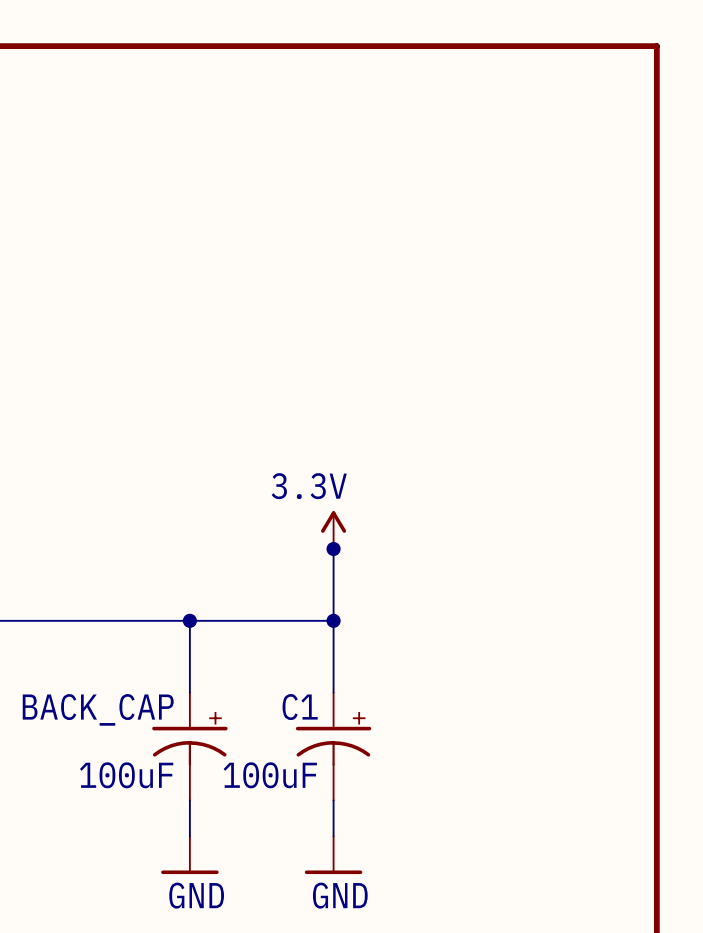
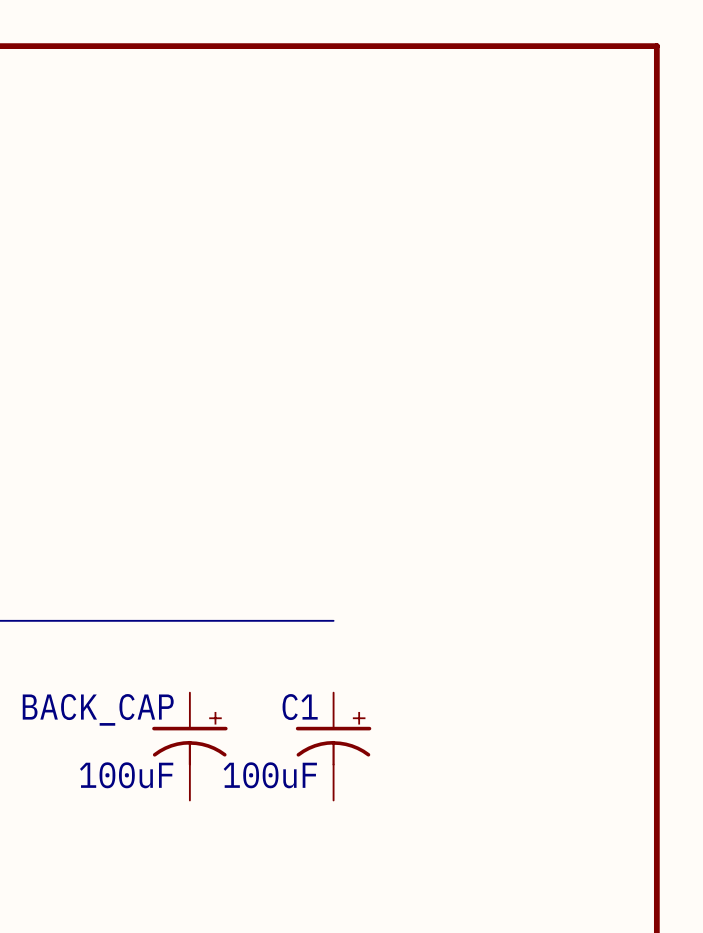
power symbol: 3.3V (333, 530) -> none
wire: (333, 549) (333, 692) -> none
junction: (333, 549) -> none
wire: (189, 620) (189, 692) -> none
junction: (189, 620) -> none
junction: (333, 620) -> none
wire: (189, 800) (189, 836) -> none
wire: (333, 800) (333, 836) -> none
power symbol: GND (189, 855) -> none
power symbol: GND (333, 855) -> none

